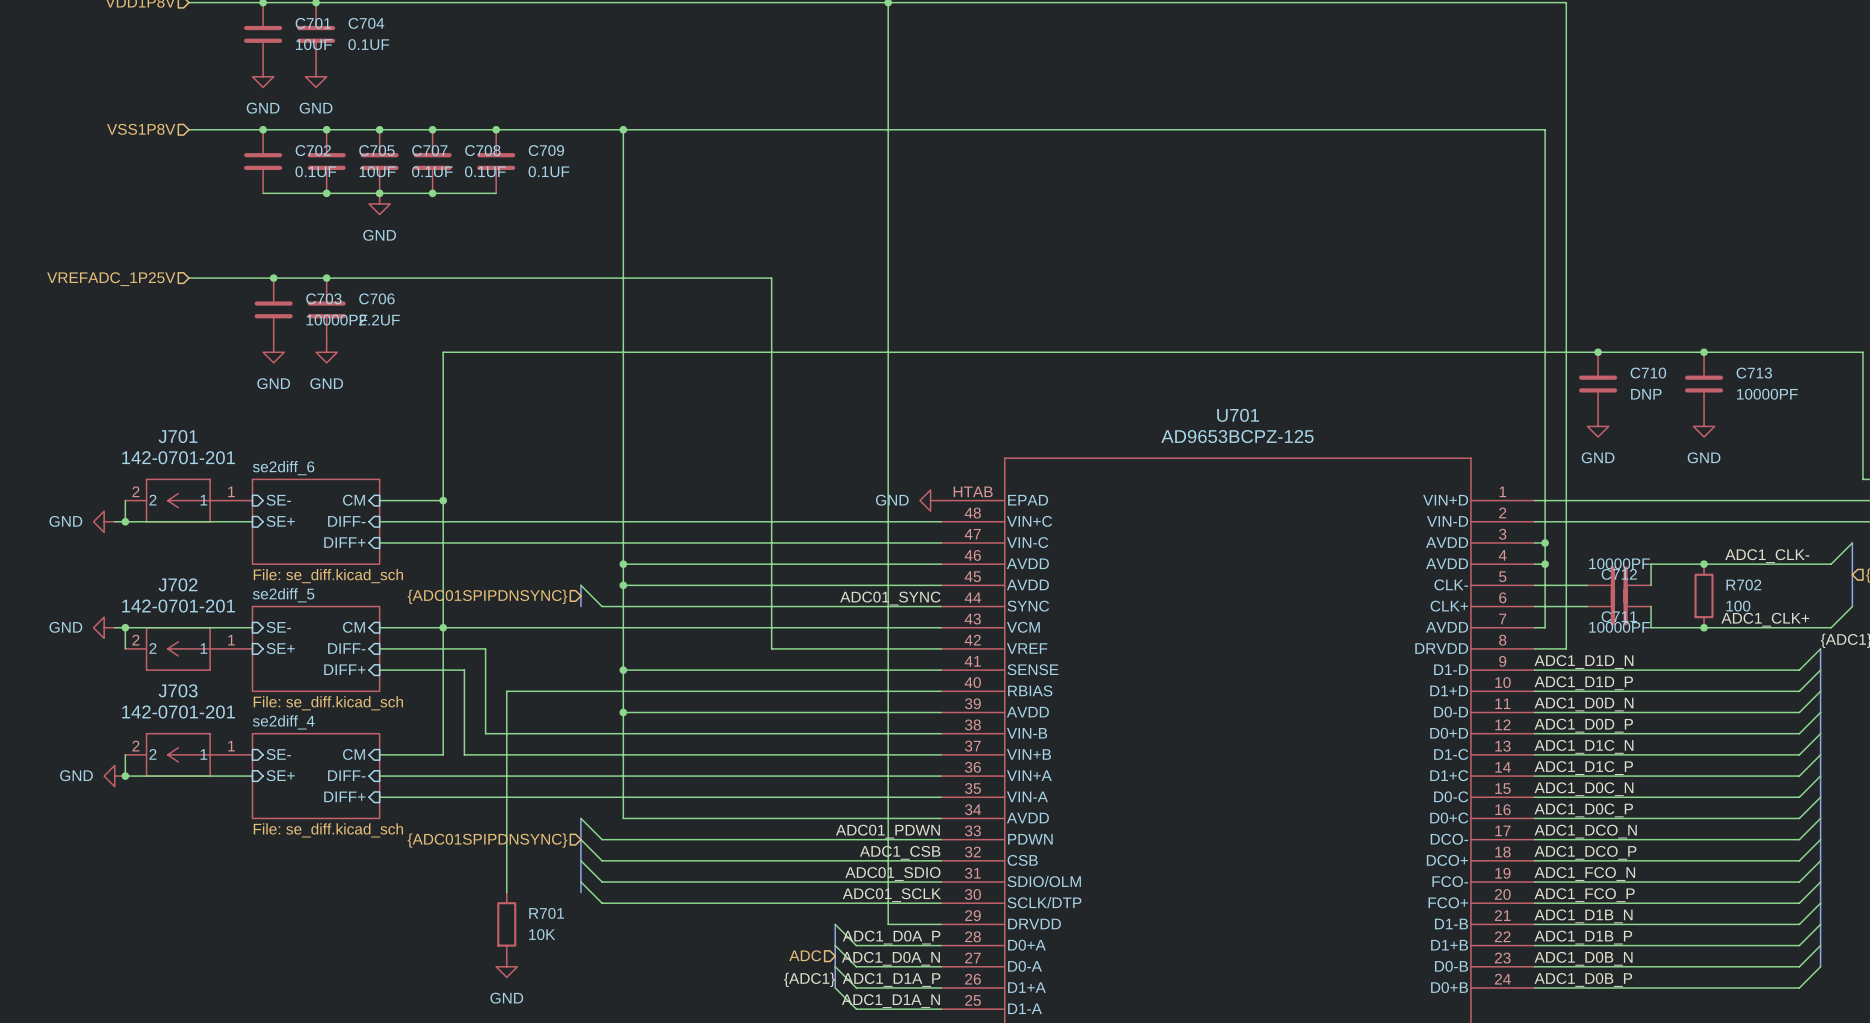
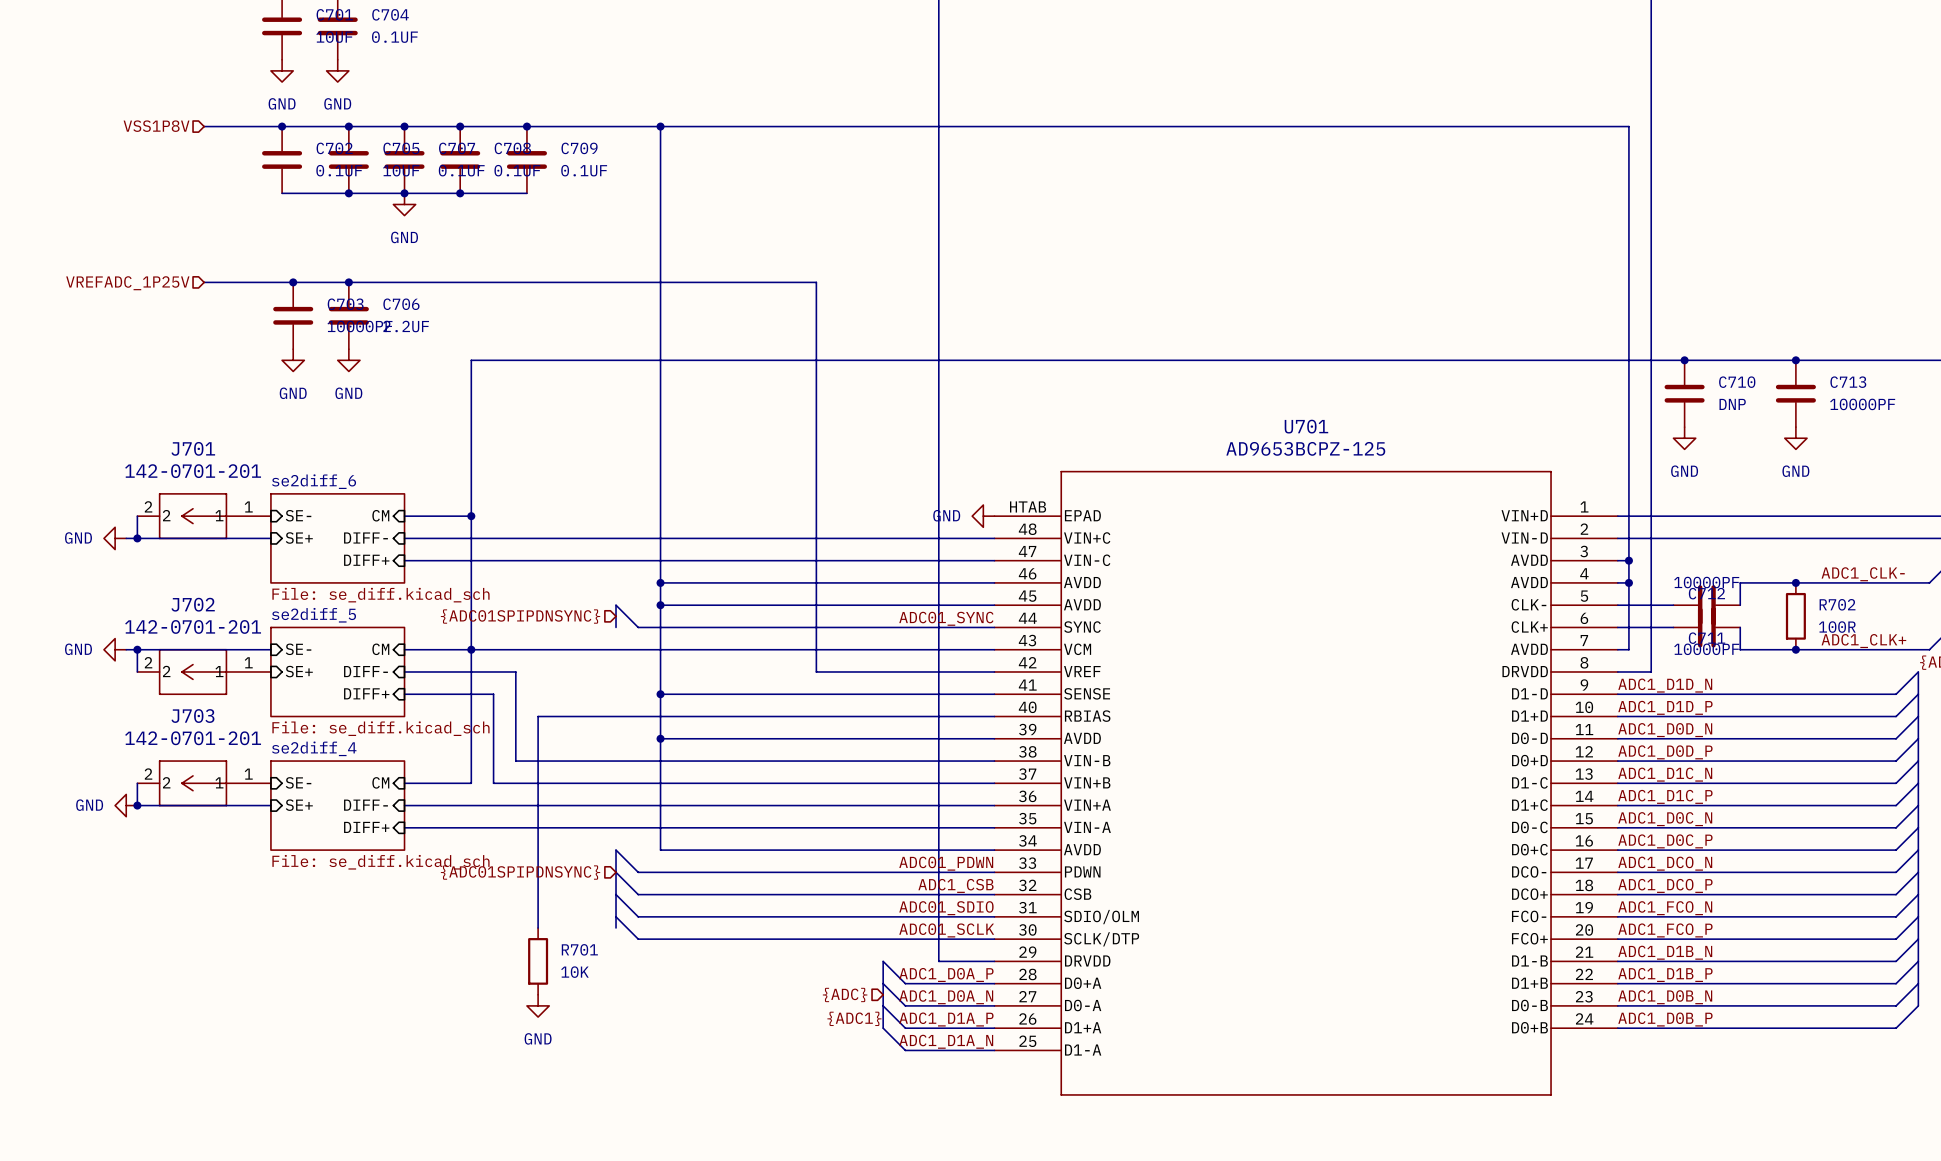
R702 value: 100 (1738, 606) -> 100R (1837, 627)
hierarchical label: ADC (805, 955) -> {ADC} (845, 994)

